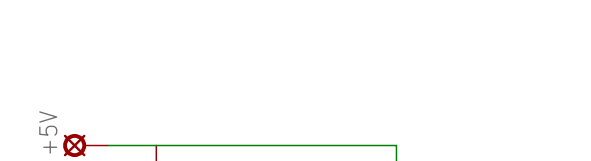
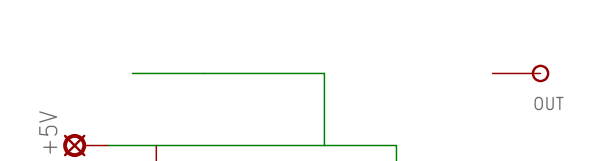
wire: none -> (132, 73) (324, 73) (324, 145)
OUT: none -> (520, 73)

